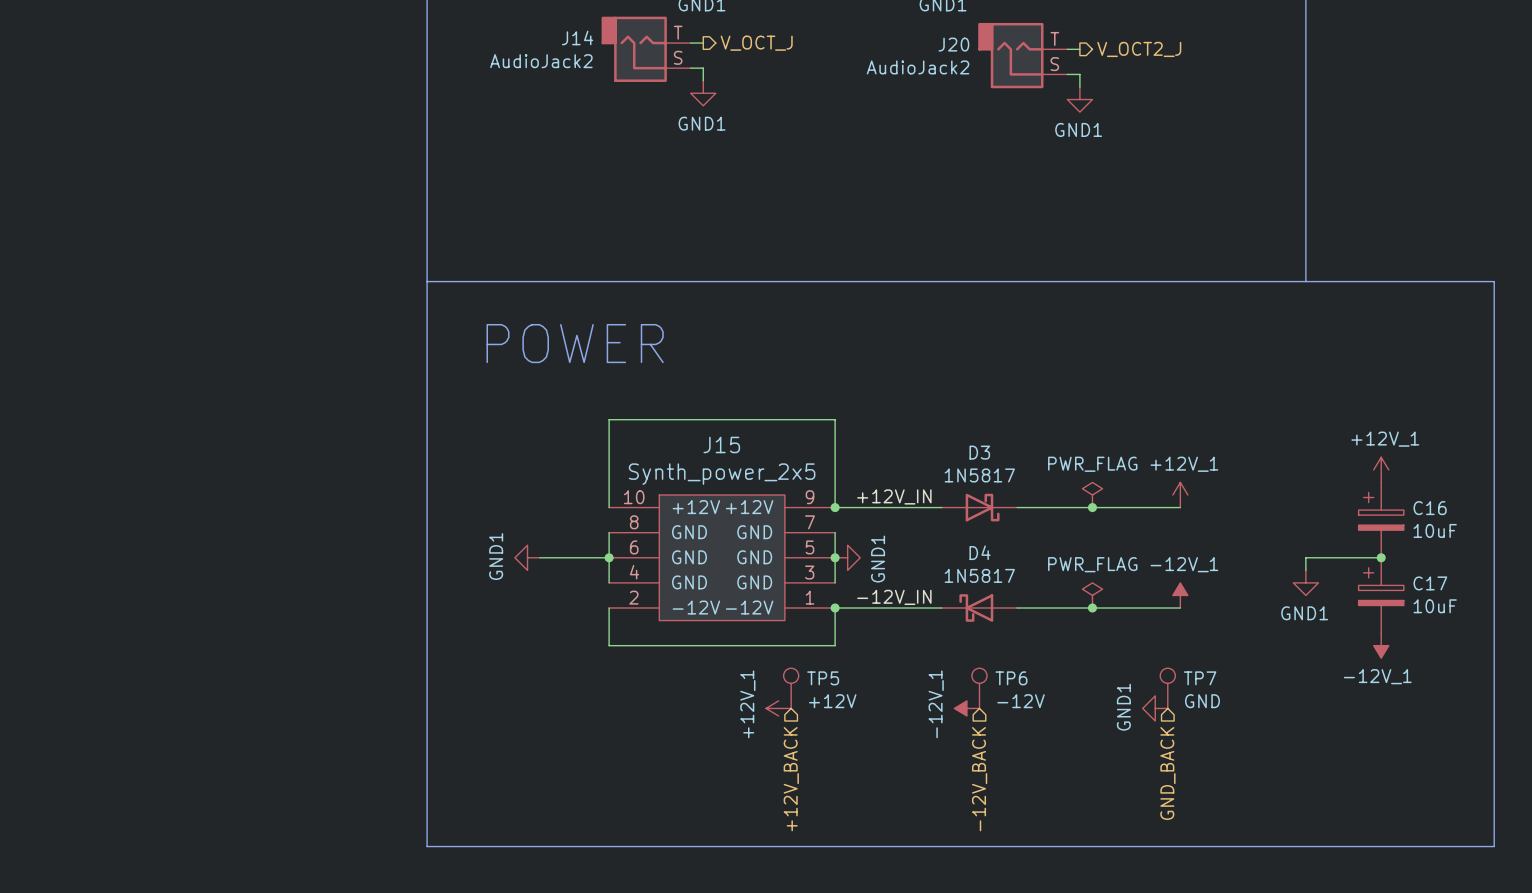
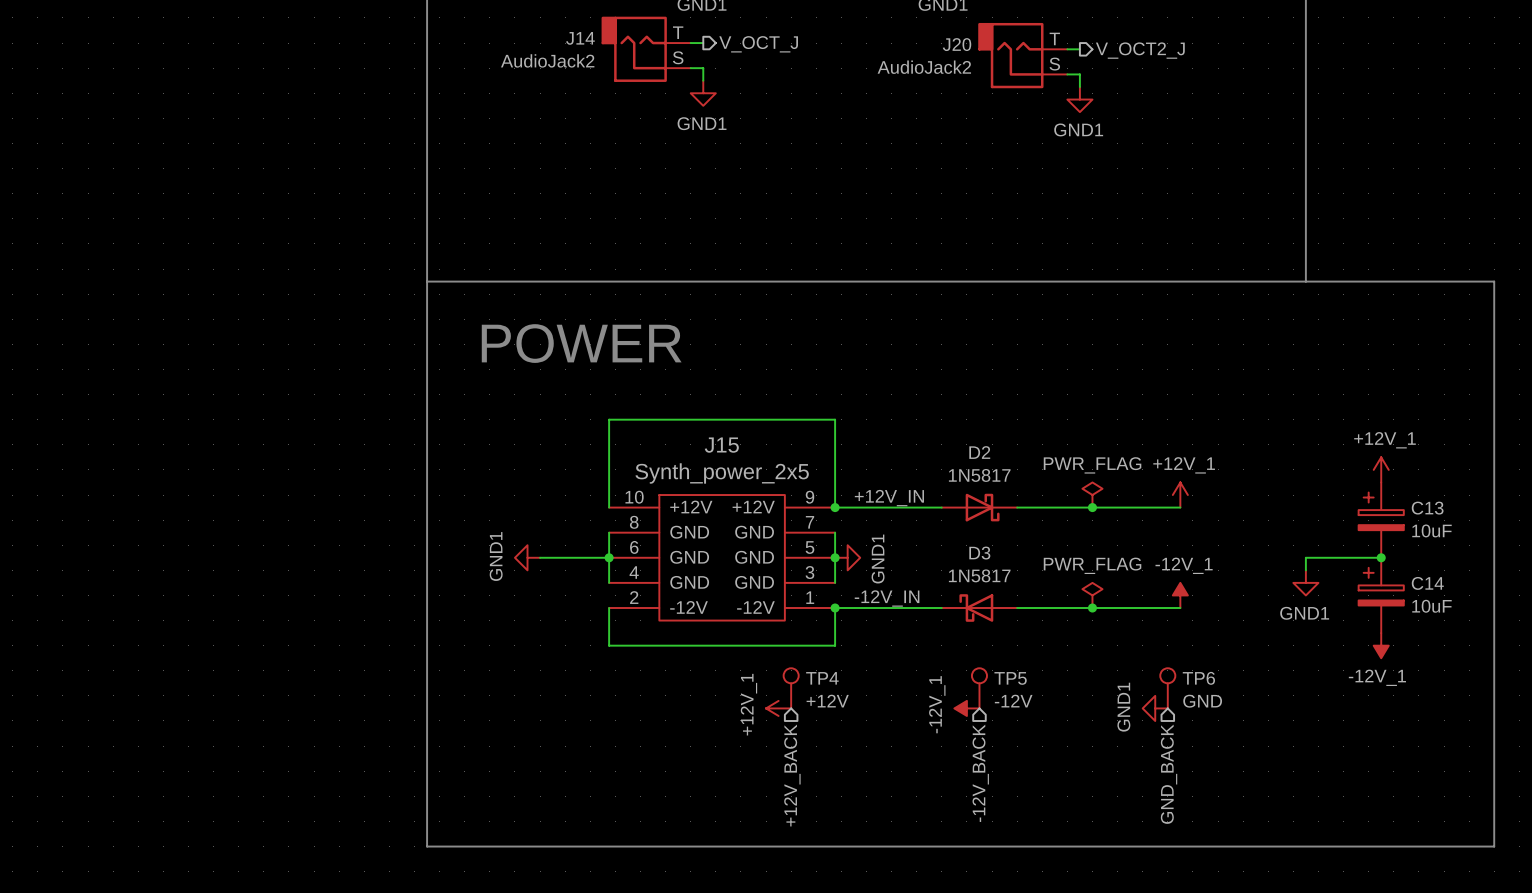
D3 name: D3 (979, 452) -> D2 (979, 452)
C16 name: C16 (1430, 508) -> C13 (1427, 508)
D4 name: D4 (980, 552) -> D3 (979, 553)
C17 name: C17 (1430, 583) -> C14 (1427, 583)
TP5 name: TP5 (823, 678) -> TP4 (822, 678)
TP6 name: TP6 (1011, 678) -> TP5 (1010, 678)
TP7 name: TP7 (1200, 678) -> TP6 (1198, 678)

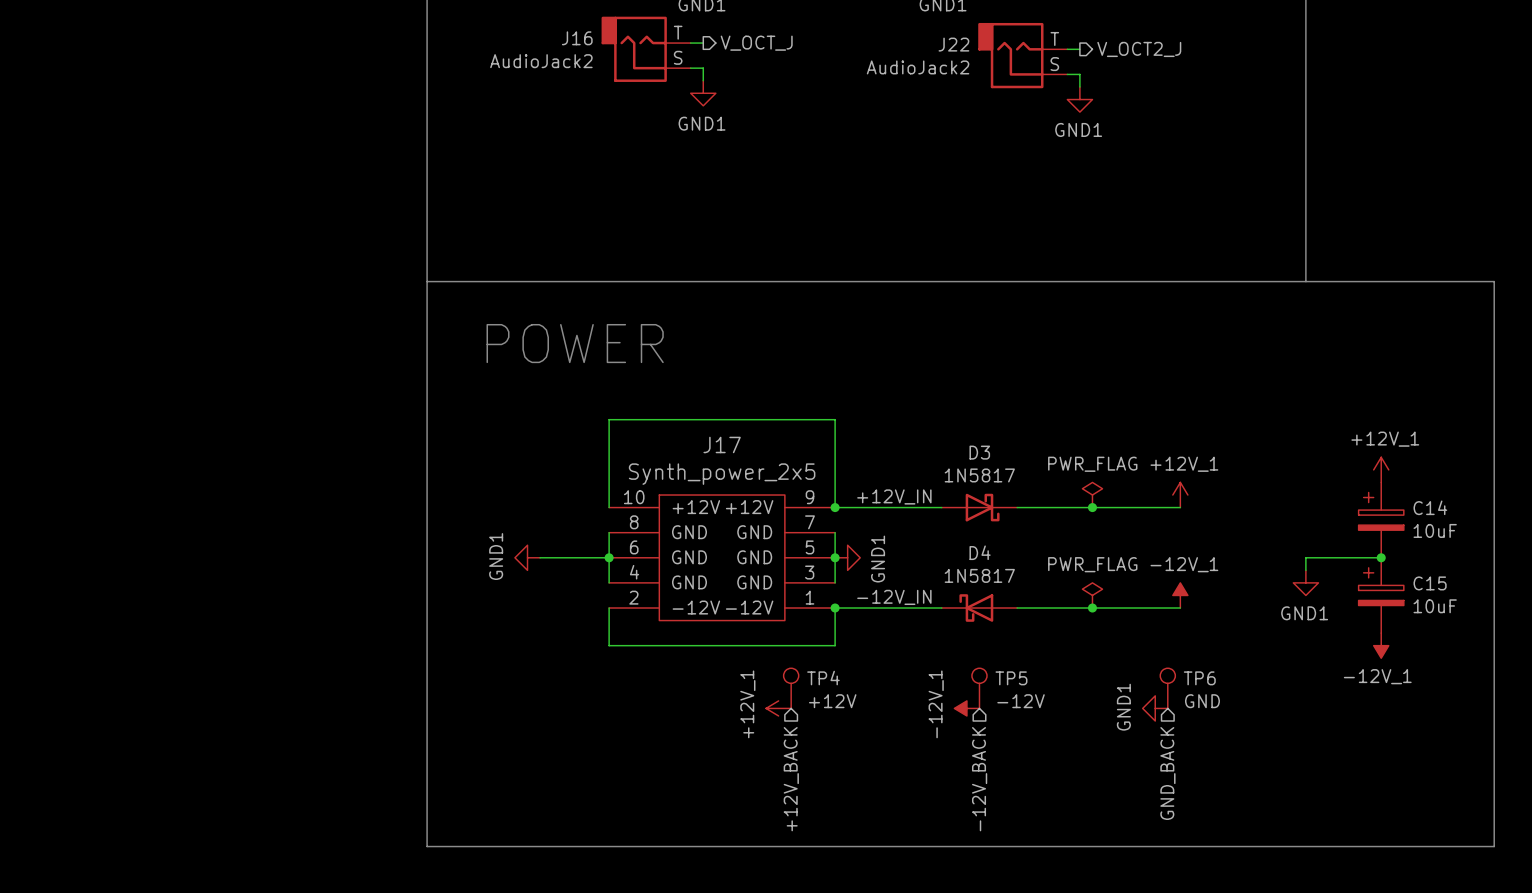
J14 name: J14 (580, 38) -> J16 (577, 38)
J20 name: J20 (957, 44) -> J22 (953, 44)
J15 name: J15 (721, 445) -> J17 (722, 444)
D2 name: D2 (979, 452) -> D3 (979, 452)
C13 name: C13 (1427, 508) -> C14 (1430, 507)
D3 name: D3 (979, 553) -> D4 (980, 552)
C14 name: C14 (1427, 583) -> C15 (1430, 583)

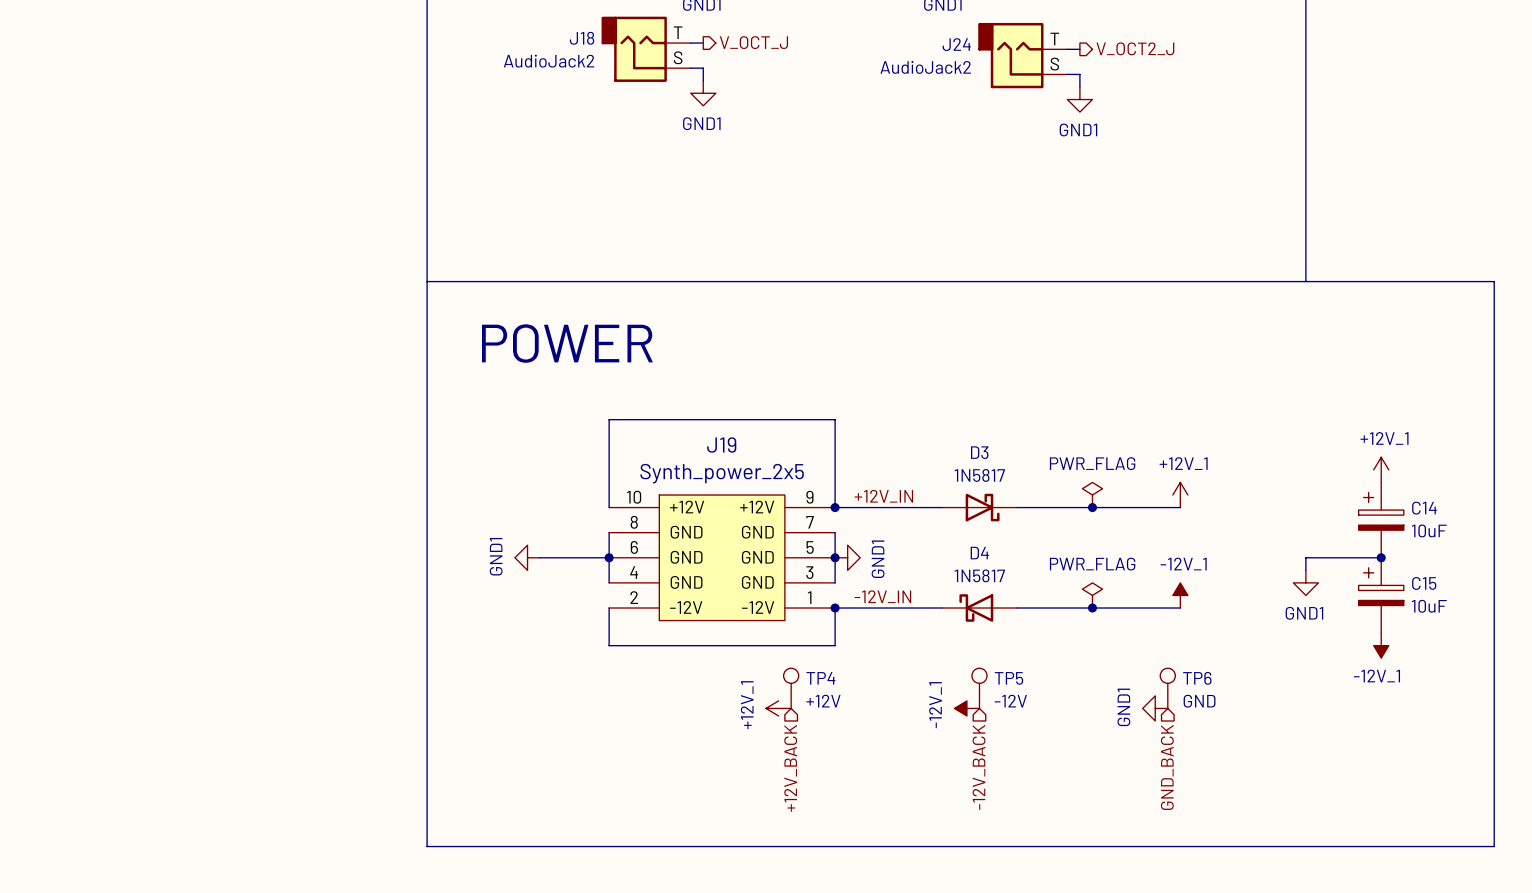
J16 name: J16 (577, 38) -> J18 (582, 38)
J22 name: J22 (953, 44) -> J24 (956, 44)
J17 name: J17 (722, 444) -> J19 (721, 444)

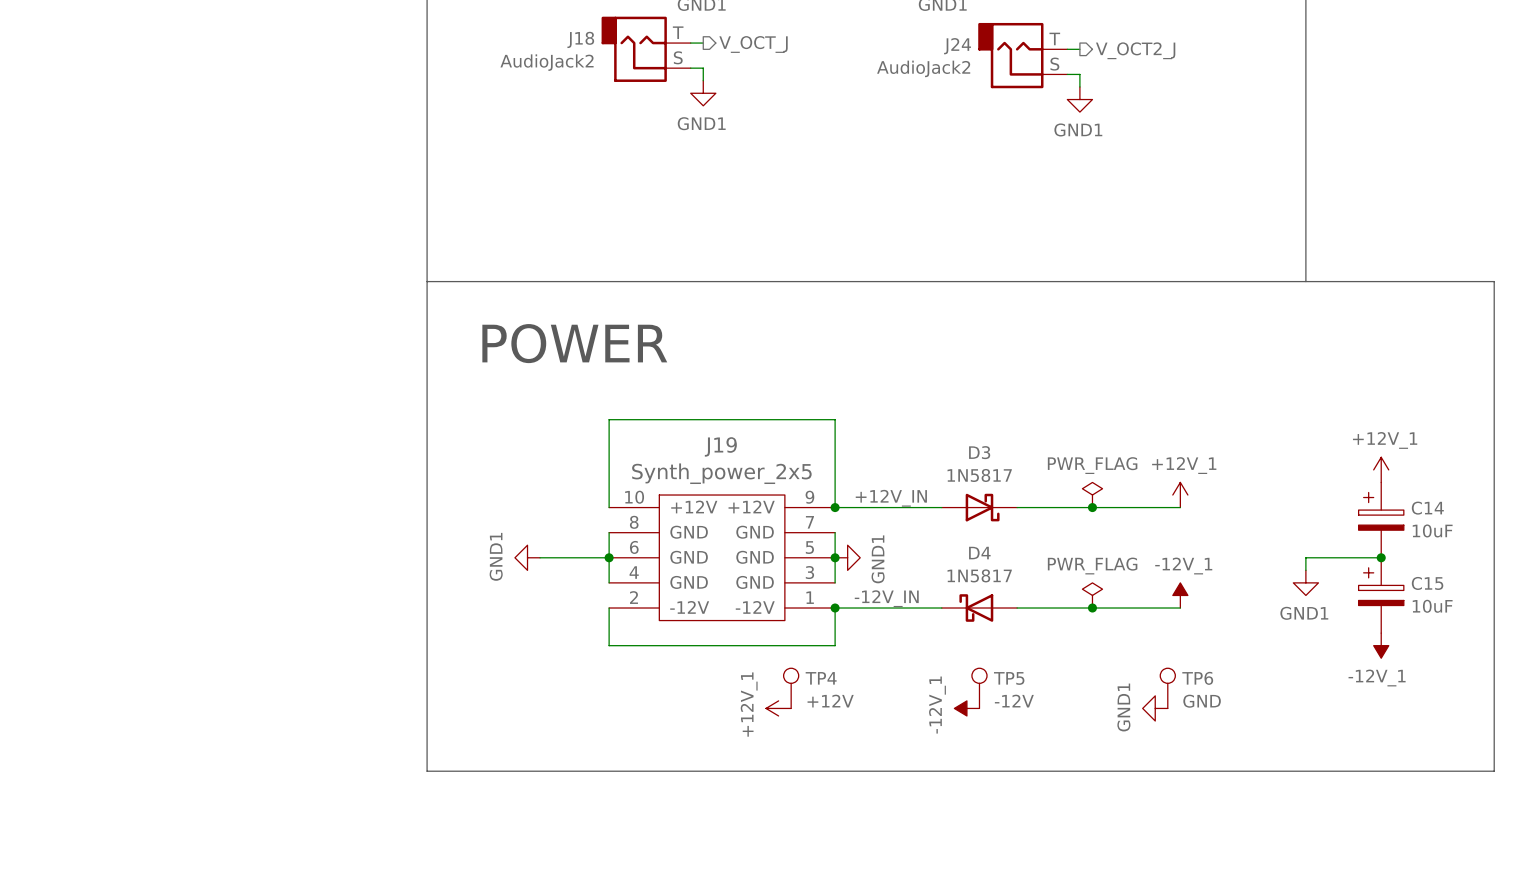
hierarchical label: -12V_BACK (979, 767) -> none
hierarchical label: GND_BACK (1167, 767) -> none
hierarchical label: +12V_BACK (790, 768) -> none
line: (427, 771) (427, 846) (1494, 846) (1494, 771) -> (427, 771) (1494, 771)

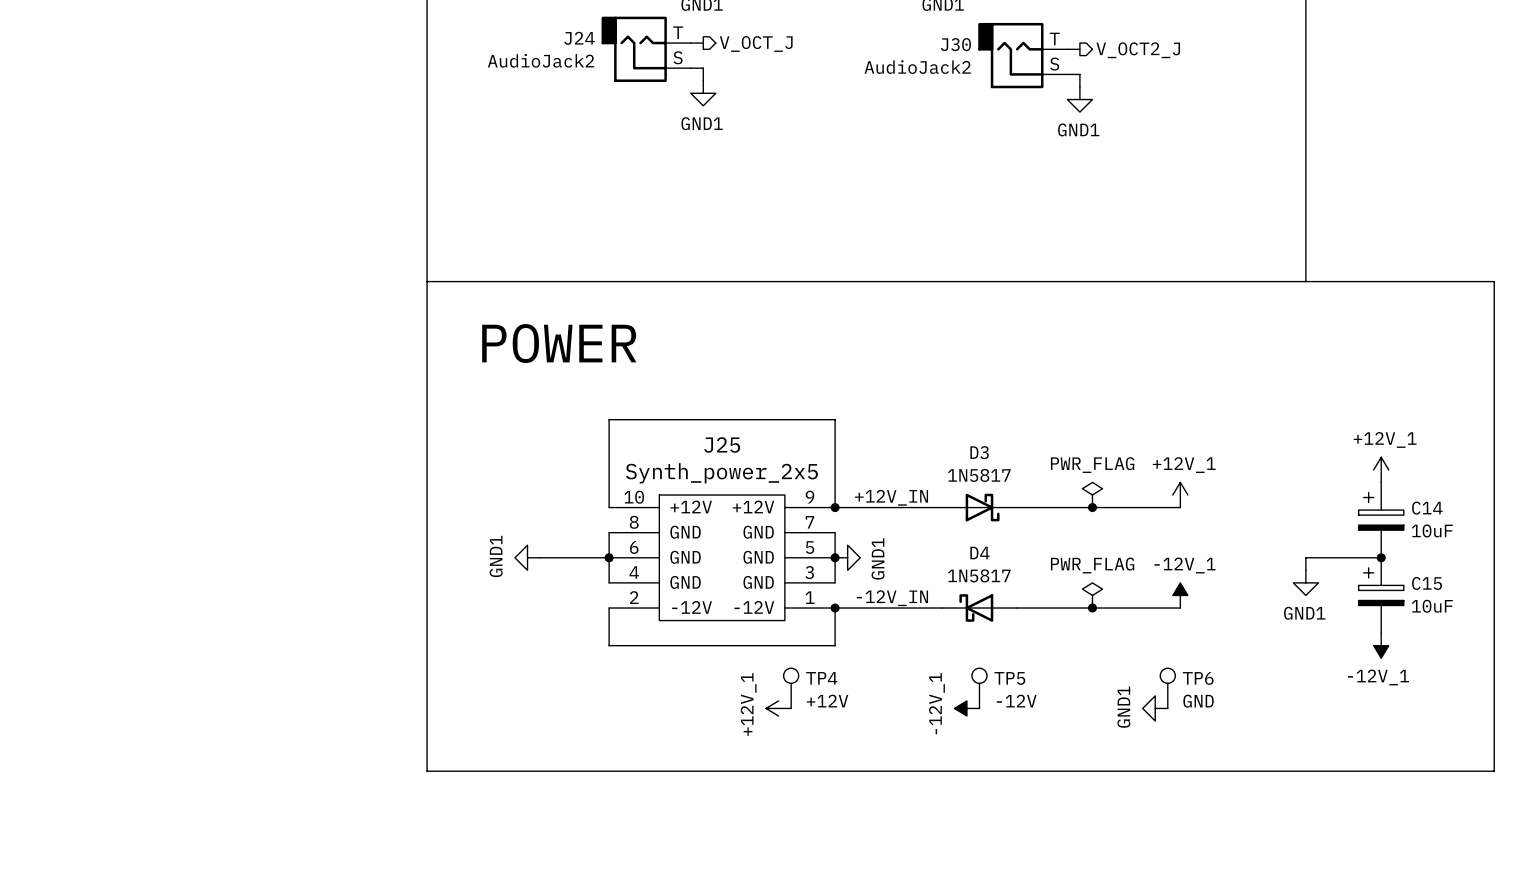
J18 name: J18 (580, 39) -> J24 (579, 38)
J24 name: J24 (957, 46) -> J30 (955, 44)
J19 name: J19 (720, 446) -> J25 (722, 444)

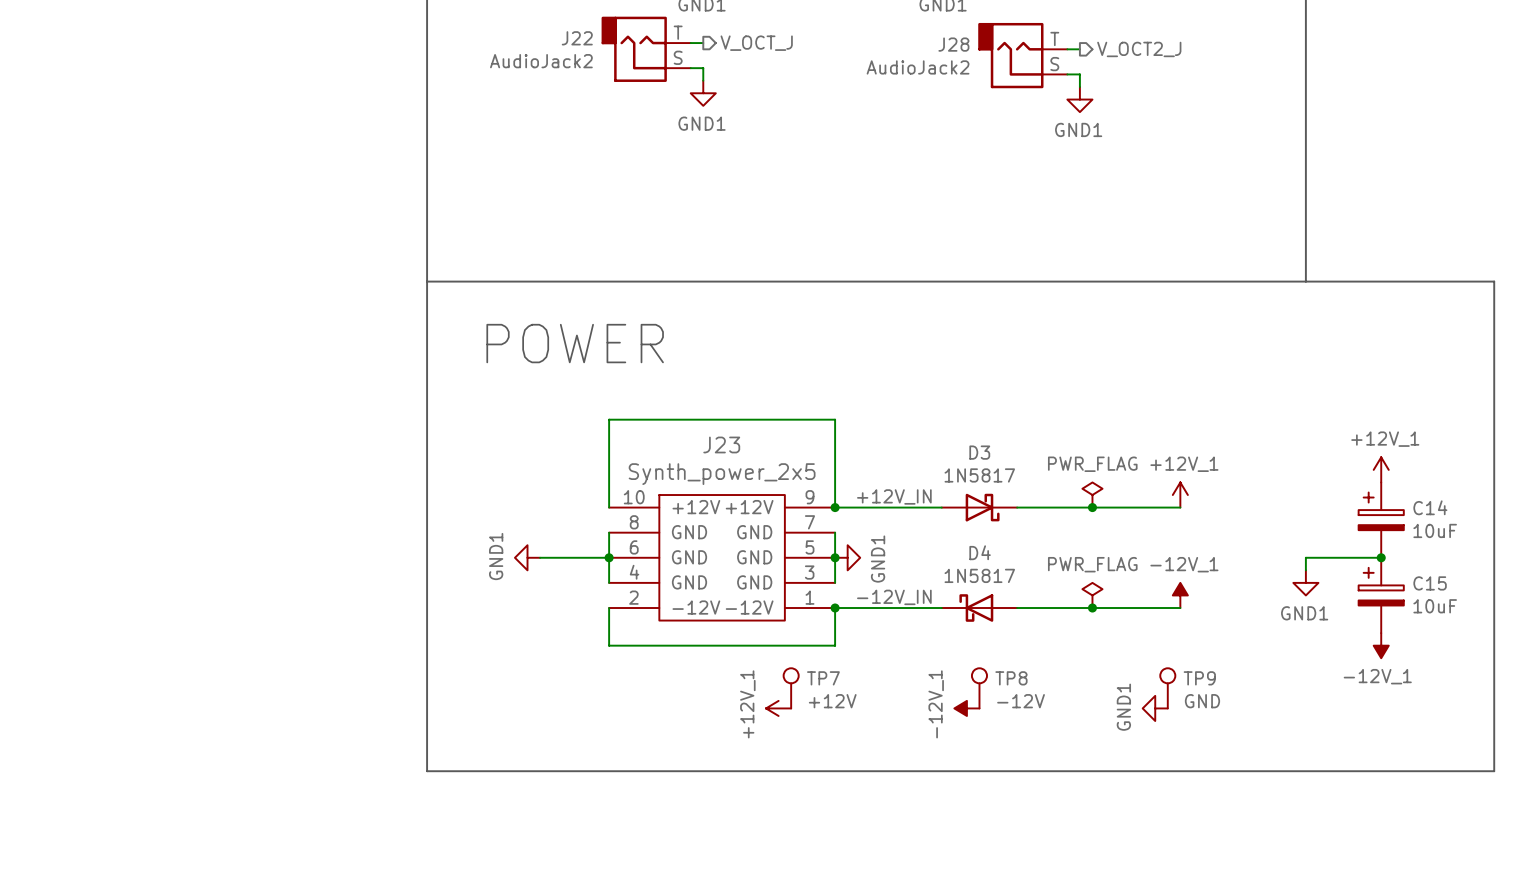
J24 name: J24 (579, 38) -> J22 (577, 38)
J30 name: J30 (955, 44) -> J28 (953, 44)
J25 name: J25 (722, 444) -> J23 (721, 444)
TP4 name: TP4 (821, 678) -> TP7 (823, 678)
TP5 name: TP5 (1009, 678) -> TP8 (1011, 678)
TP6 name: TP6 (1198, 678) -> TP9 (1199, 678)

